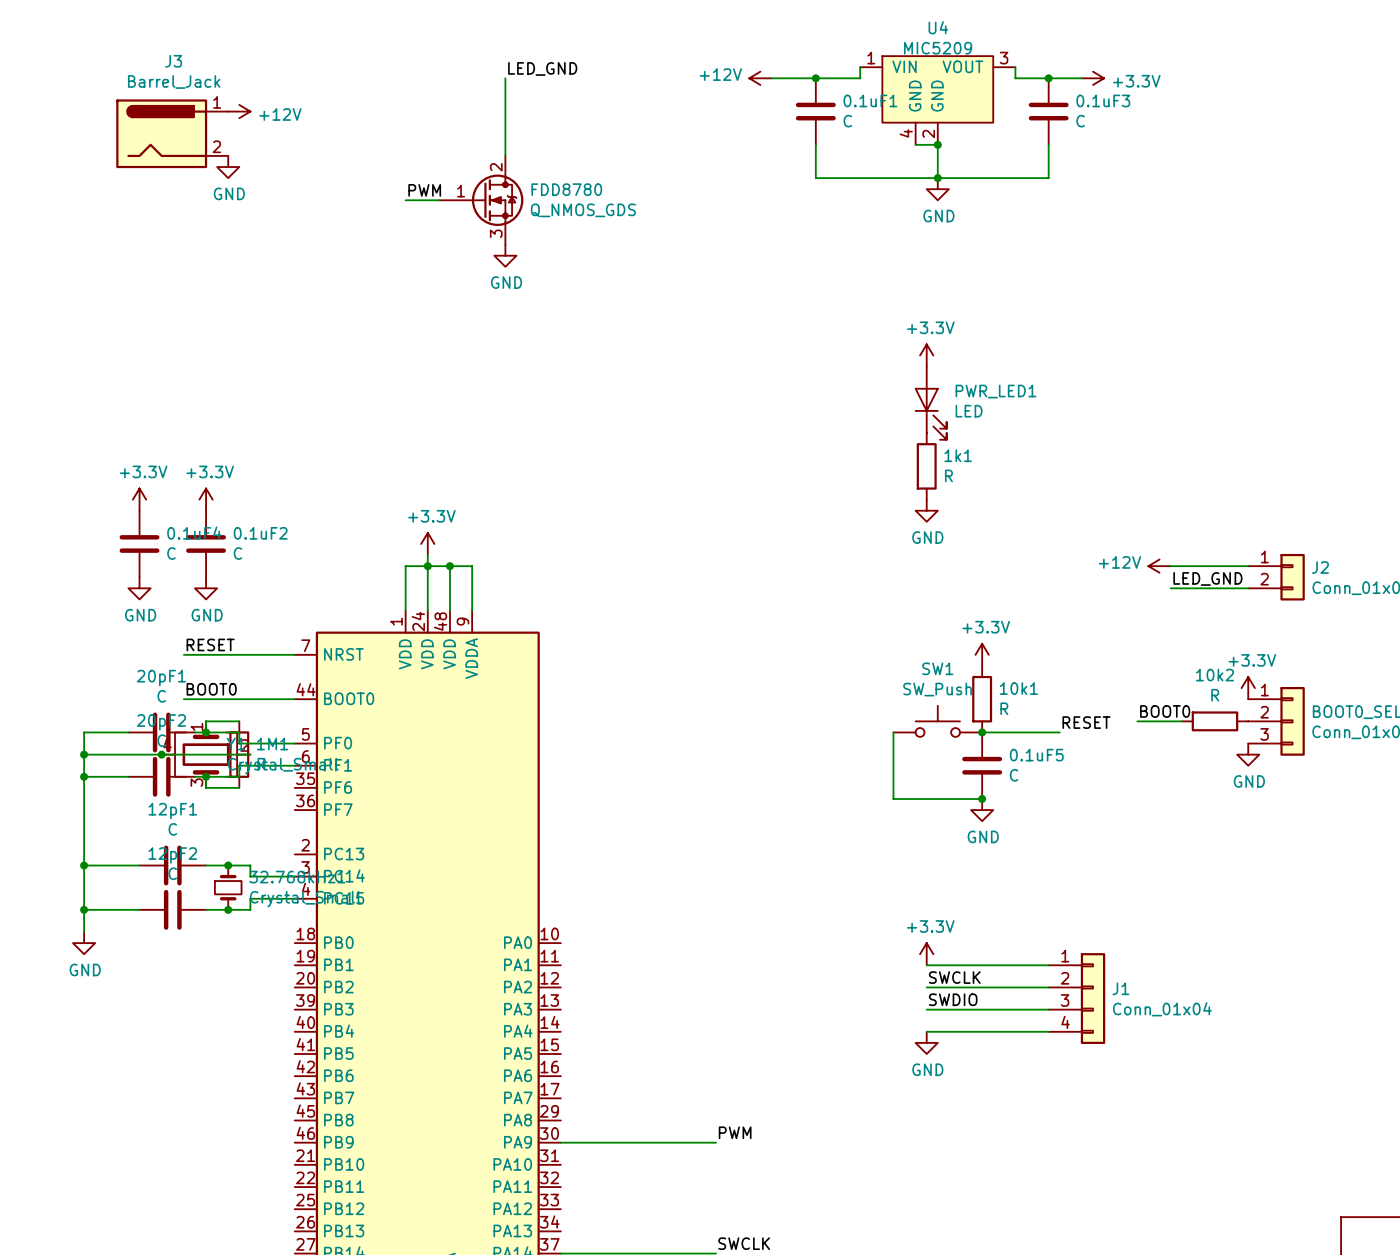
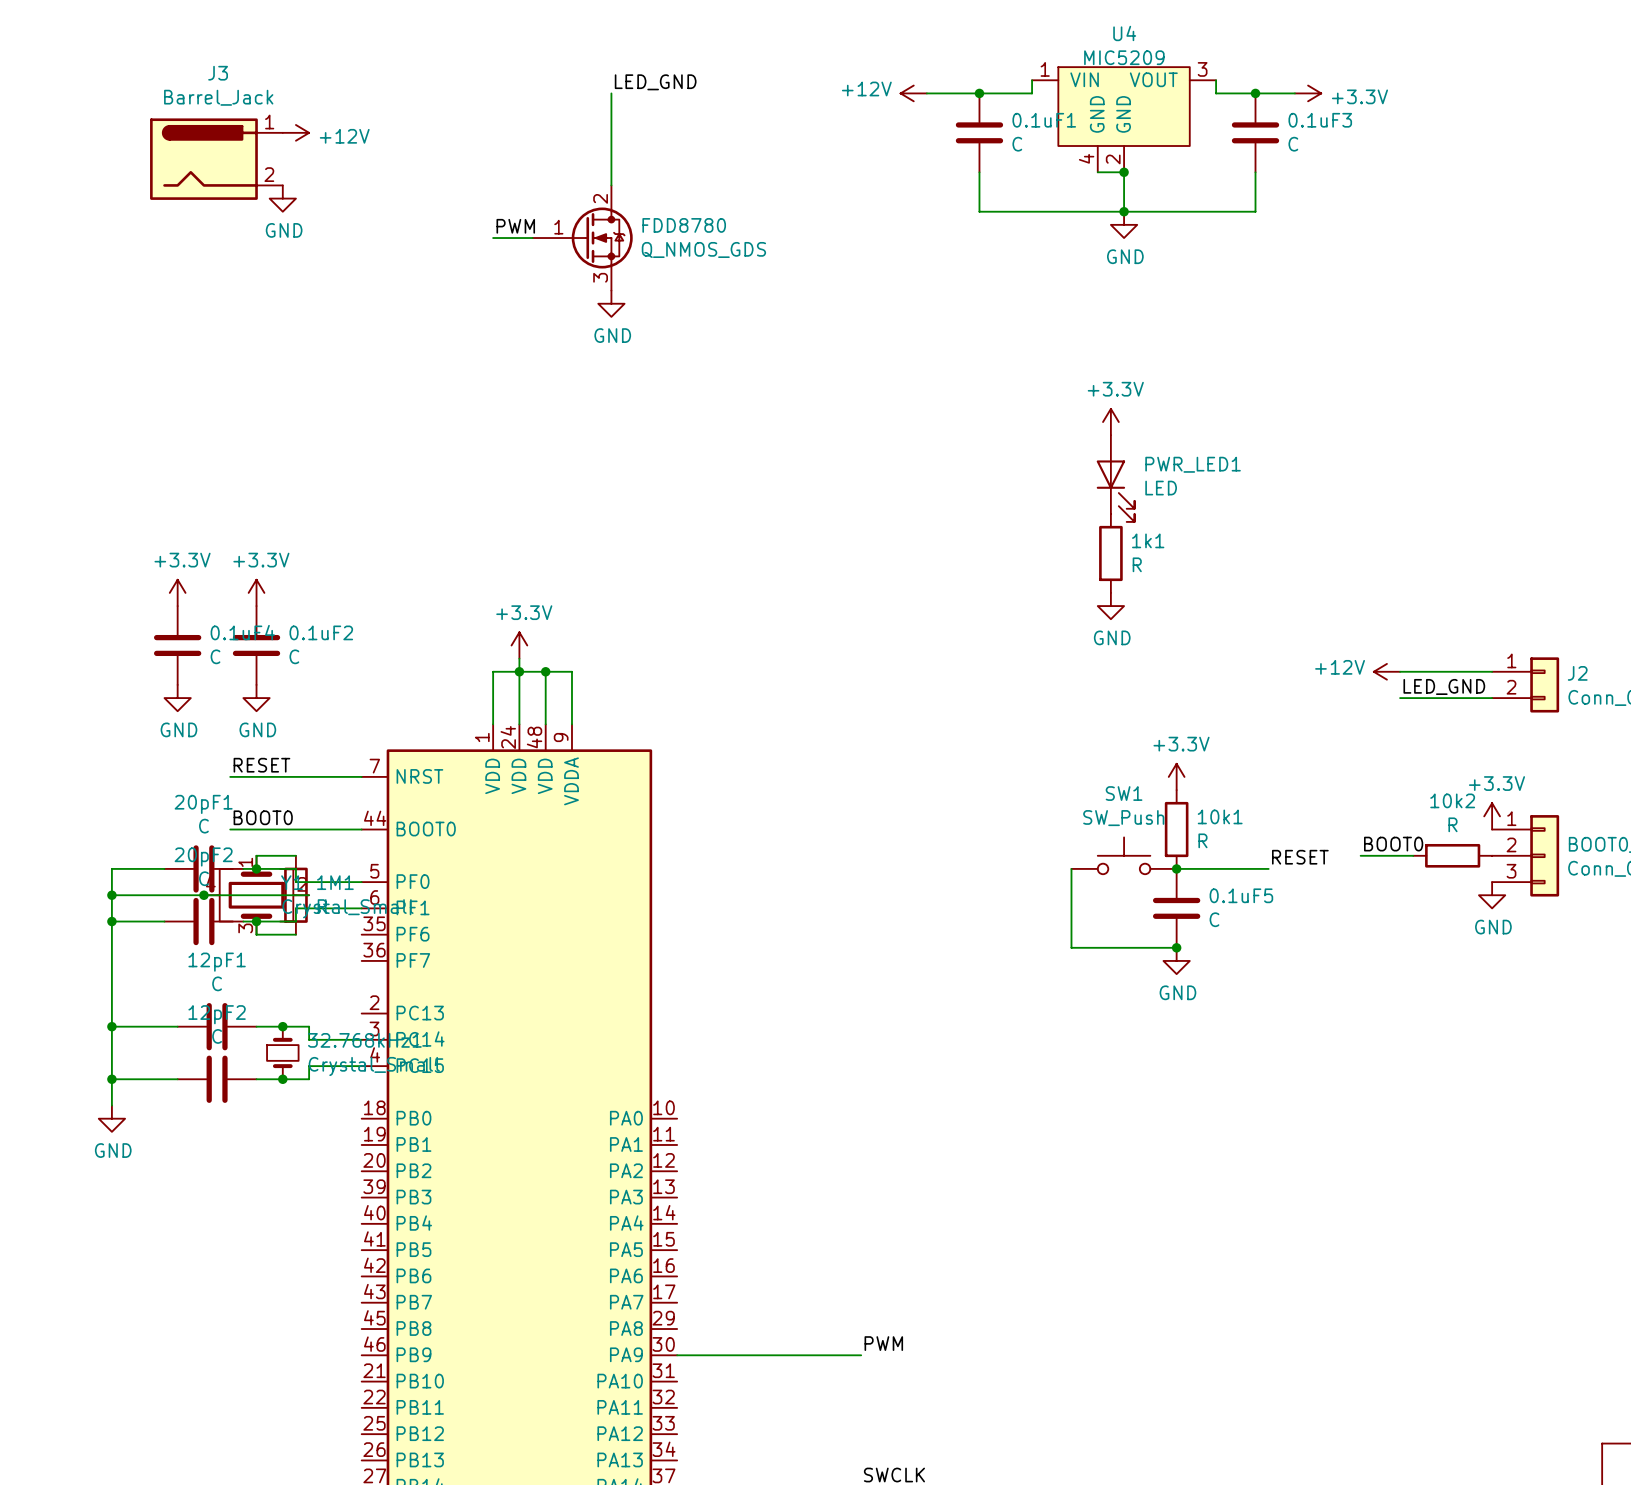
power symbol: +3.3V (926, 954) -> none
wire: (926, 965) (1048, 965) -> none
label: SWCLK (954, 977) -> none
wire: (926, 987) (1048, 987) -> none
J1: Conn_01x04 (1076, 998) -> none
label: SWDIO (953, 999) -> none
wire: (926, 1009) (1048, 1009) -> none
wire: (926, 1031) (1048, 1031) -> none
power symbol: GND (926, 1042) -> none

